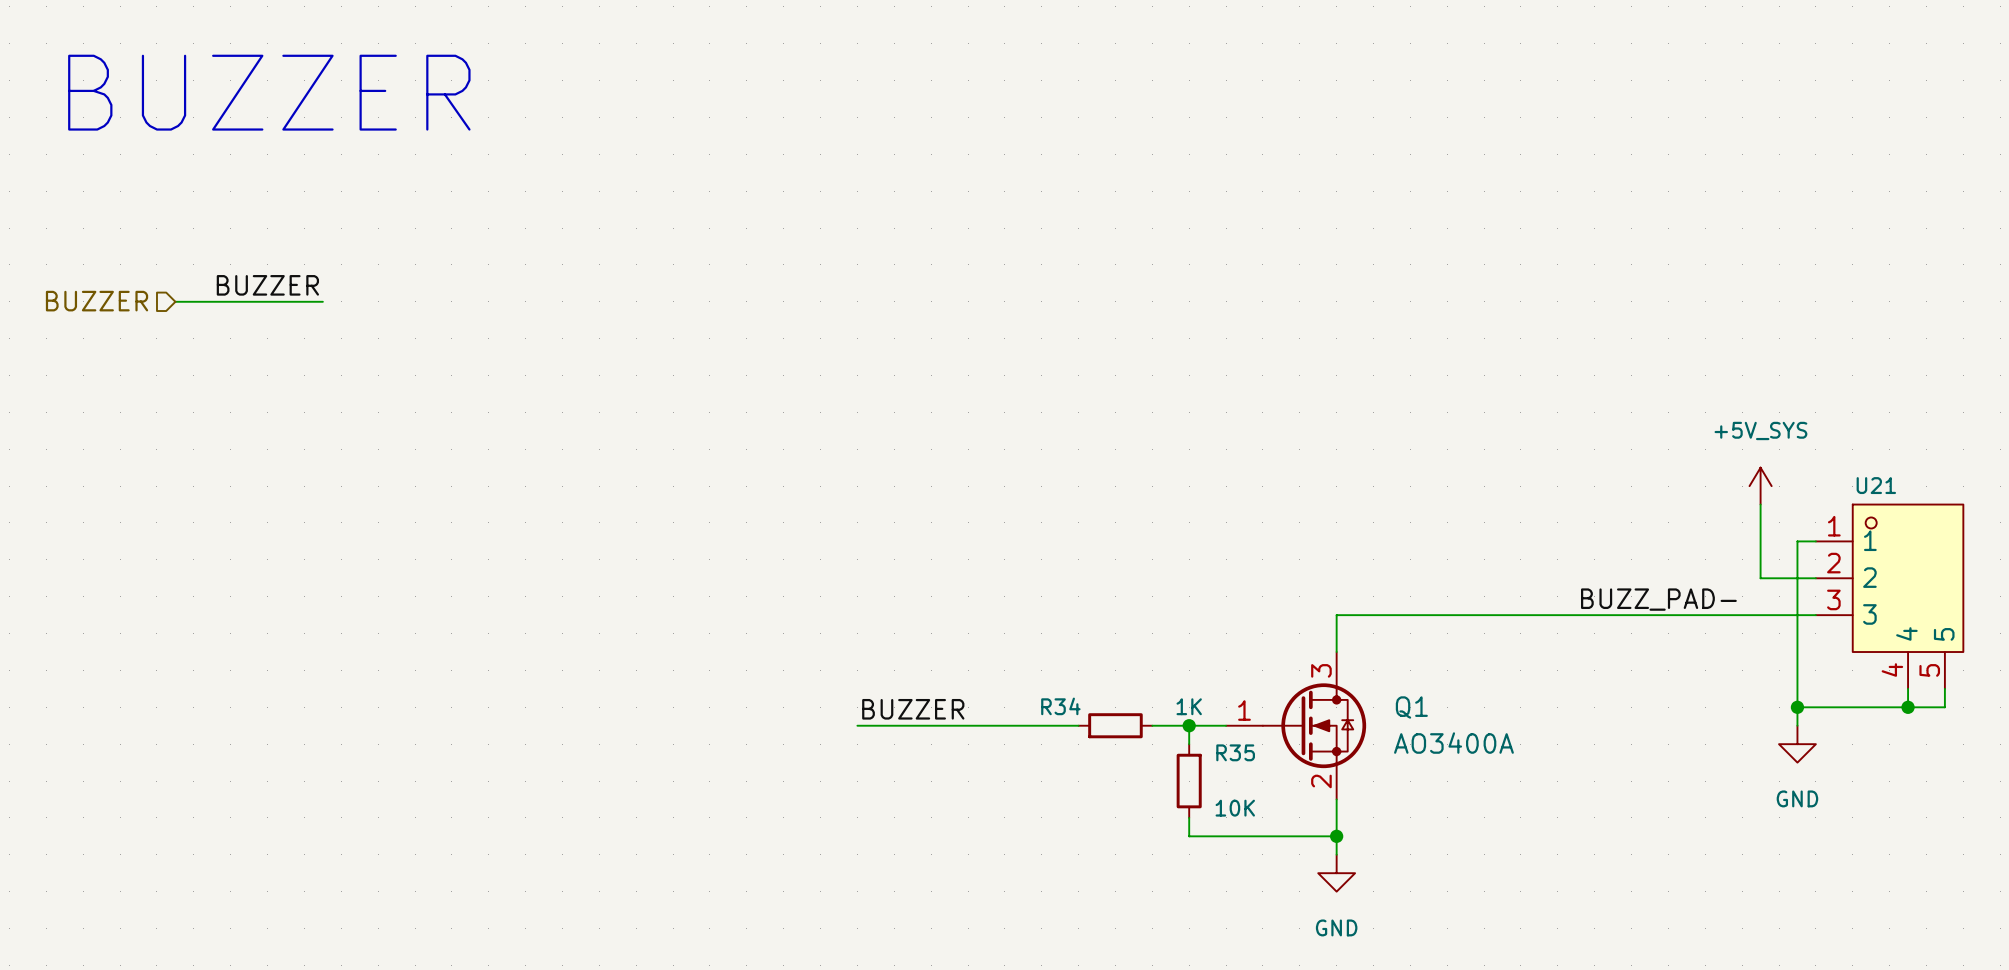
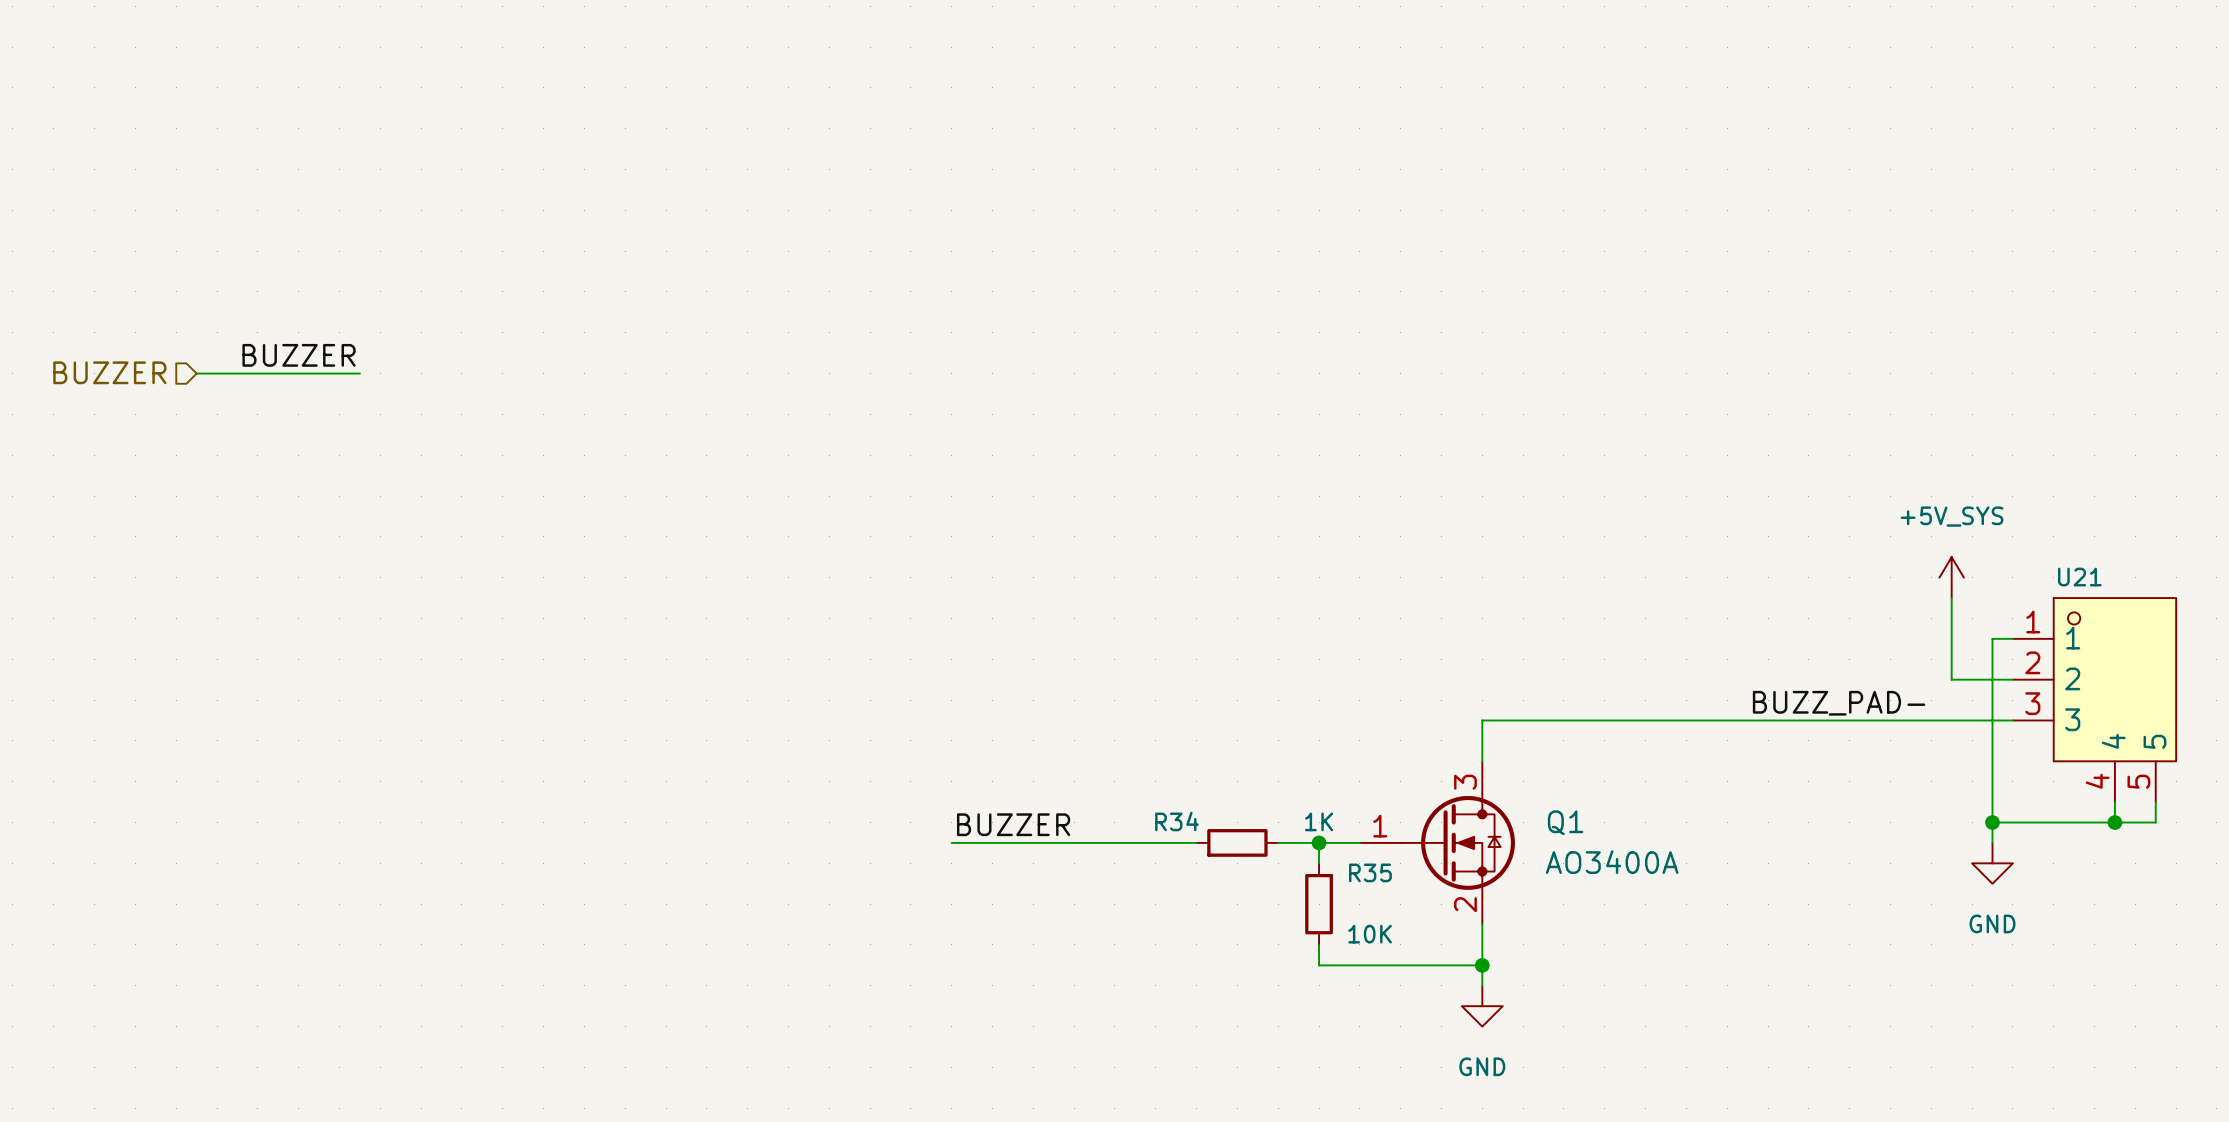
text: BUZZER (269, 92) -> none

